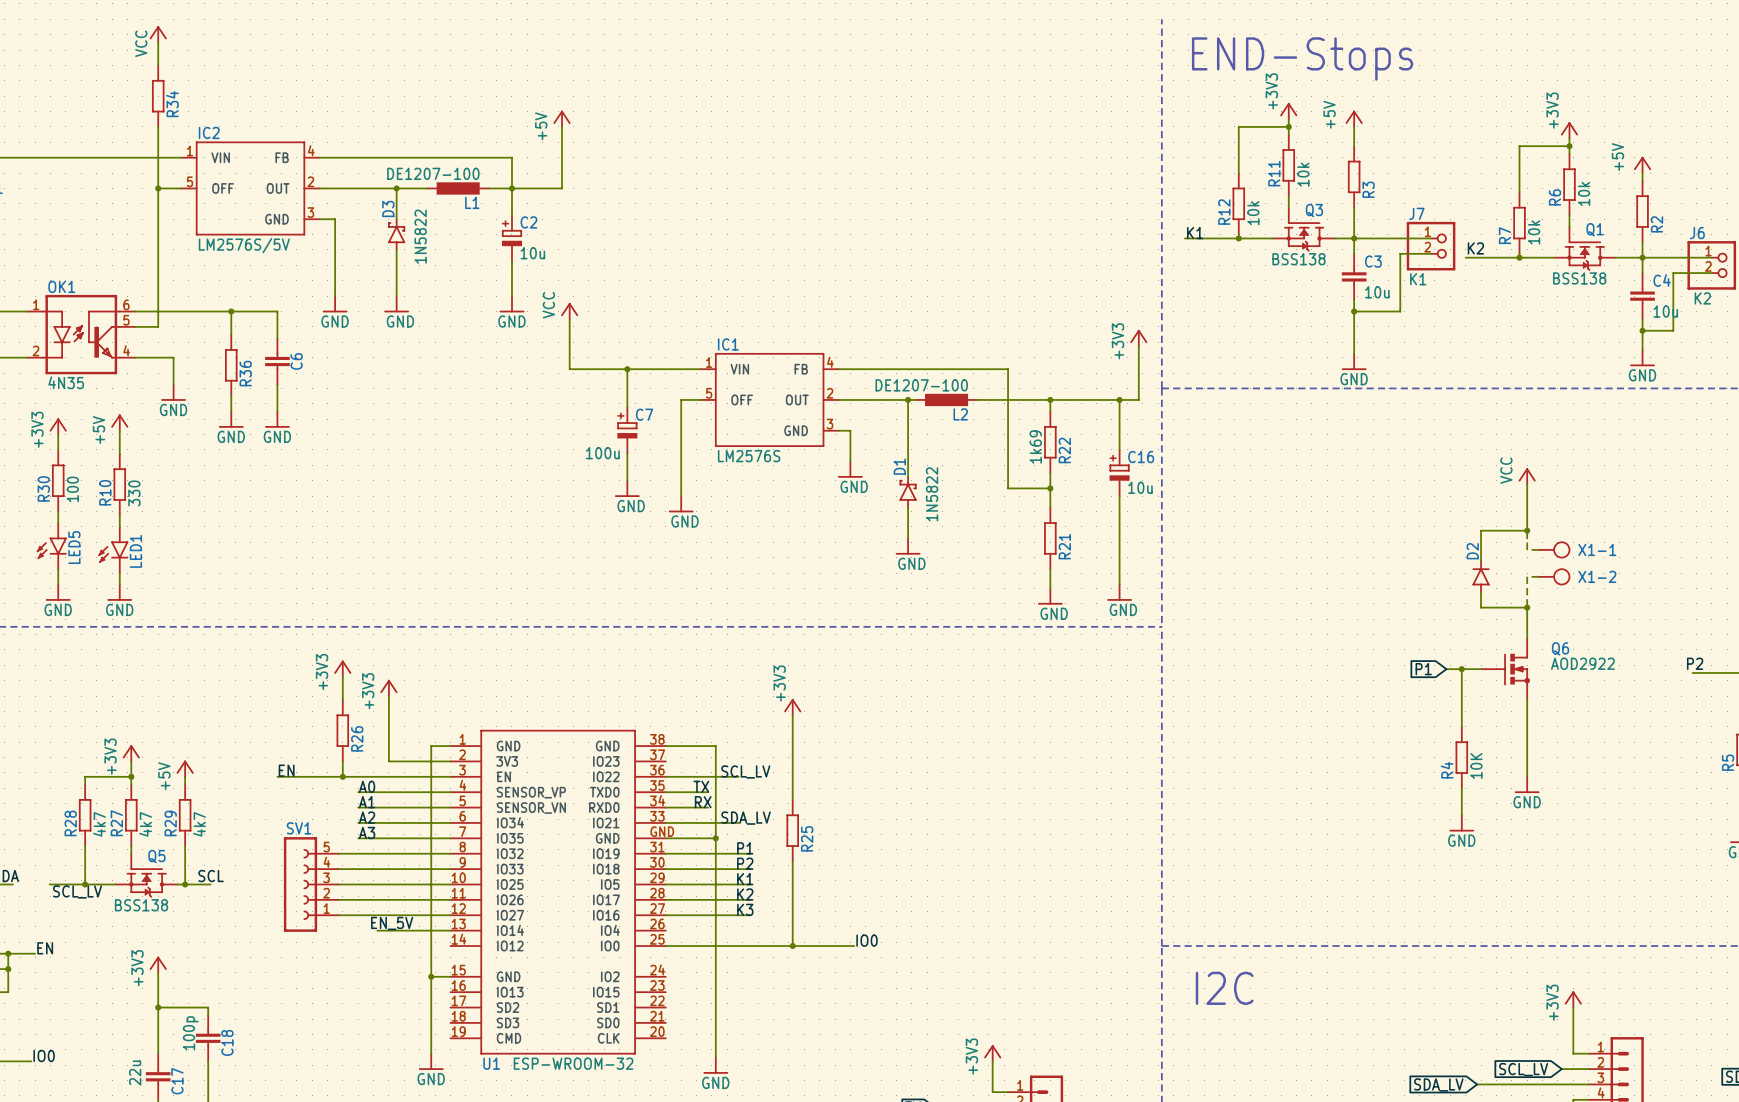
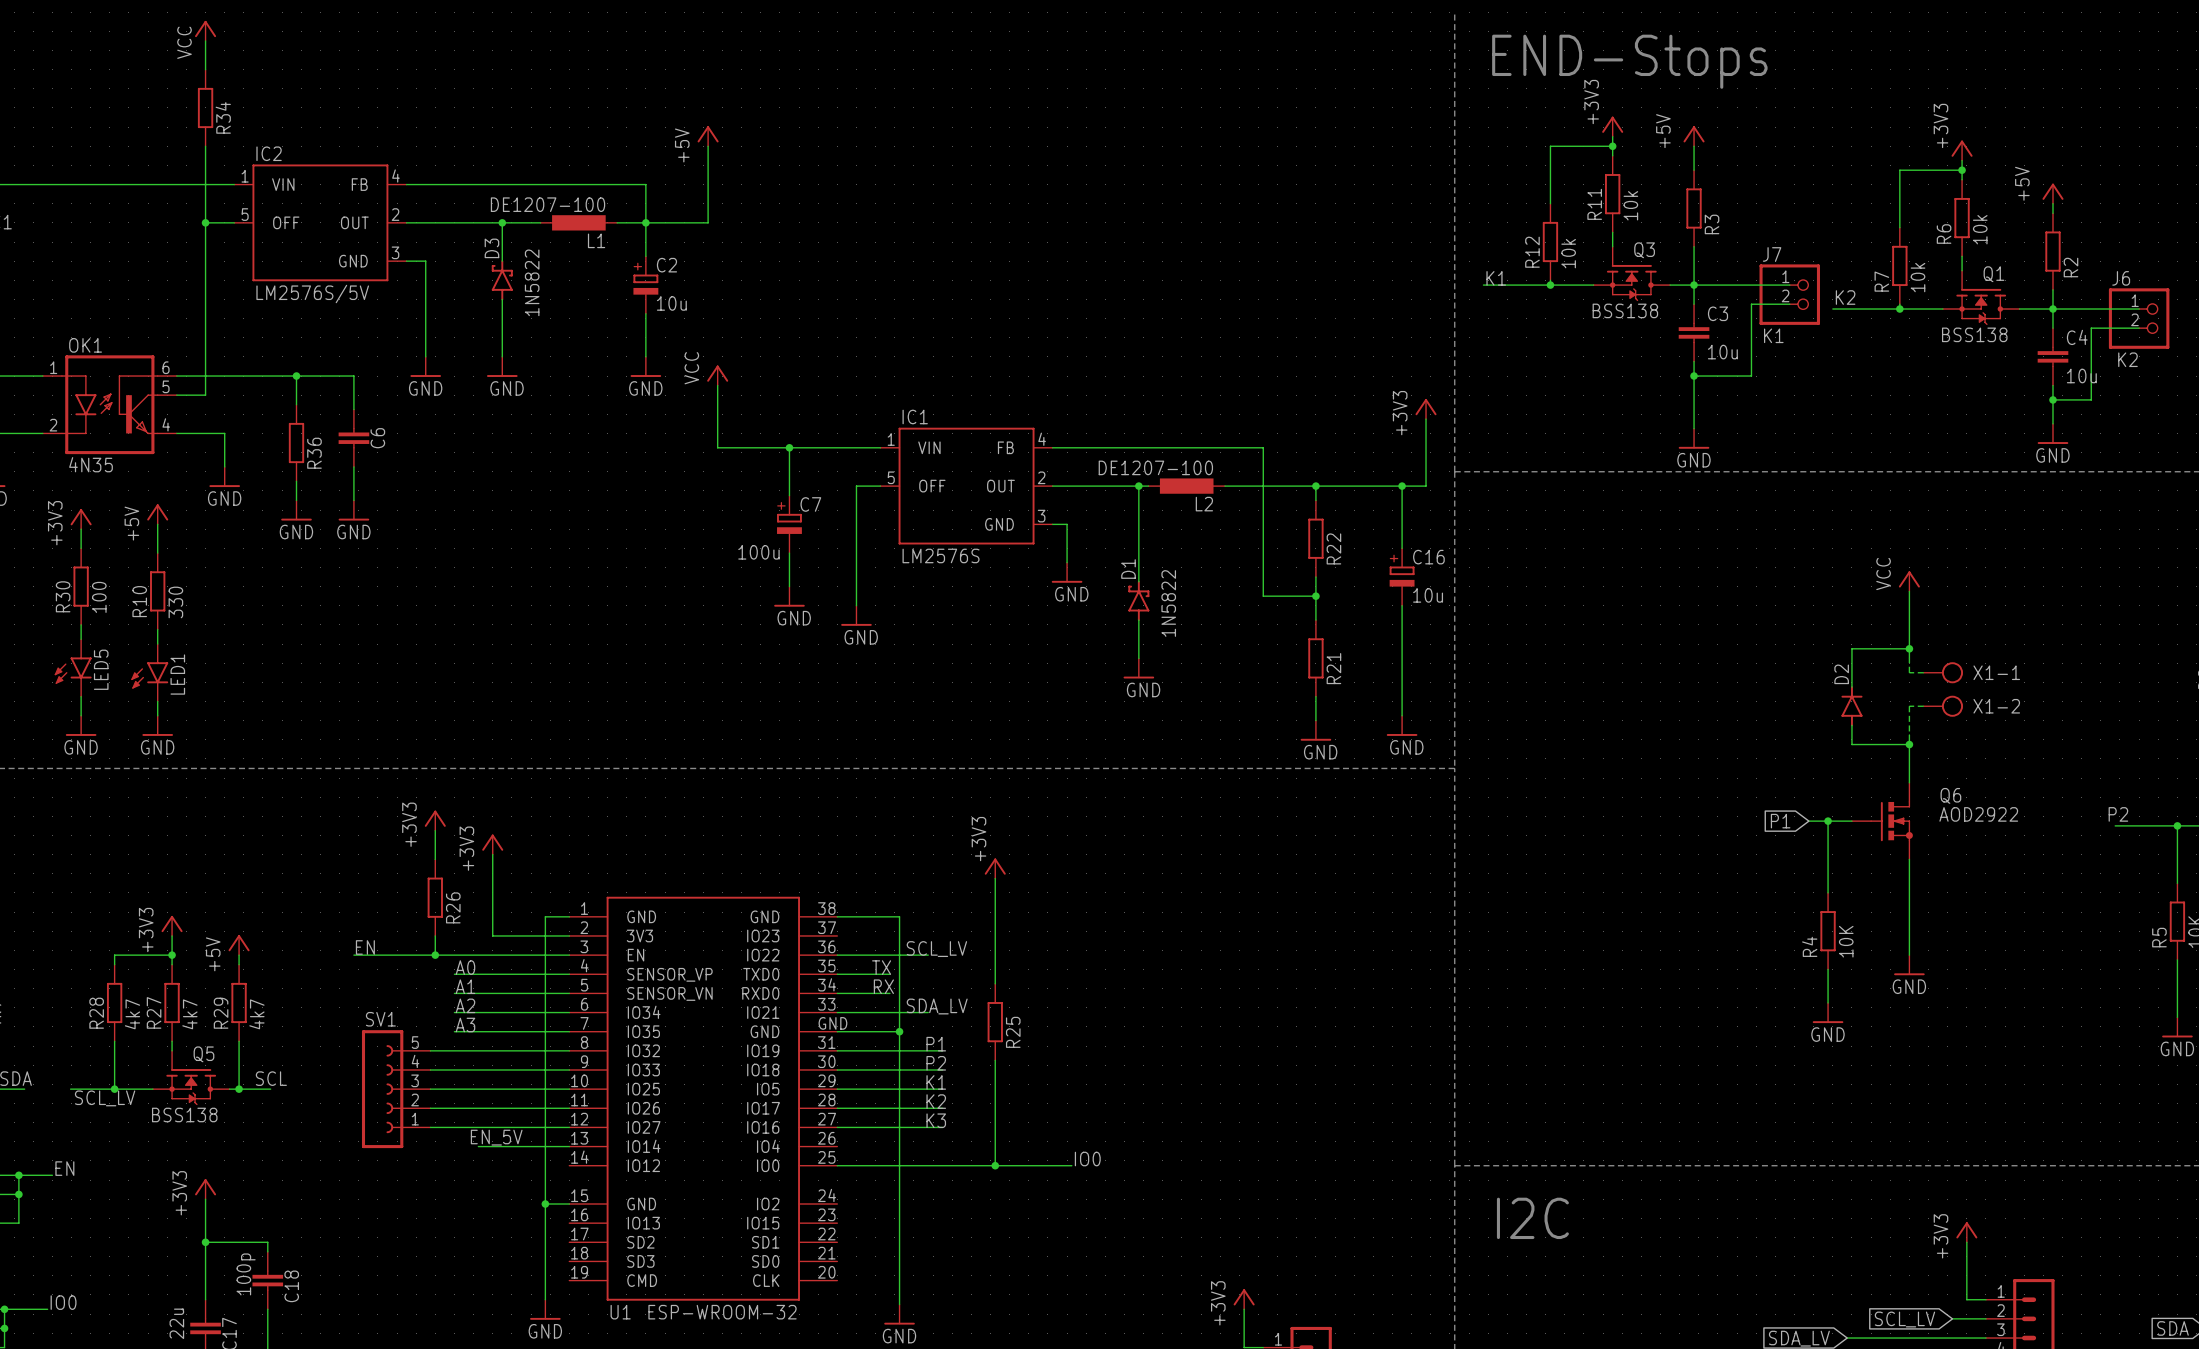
R22 value: 1k69 (1035, 447) -> none

